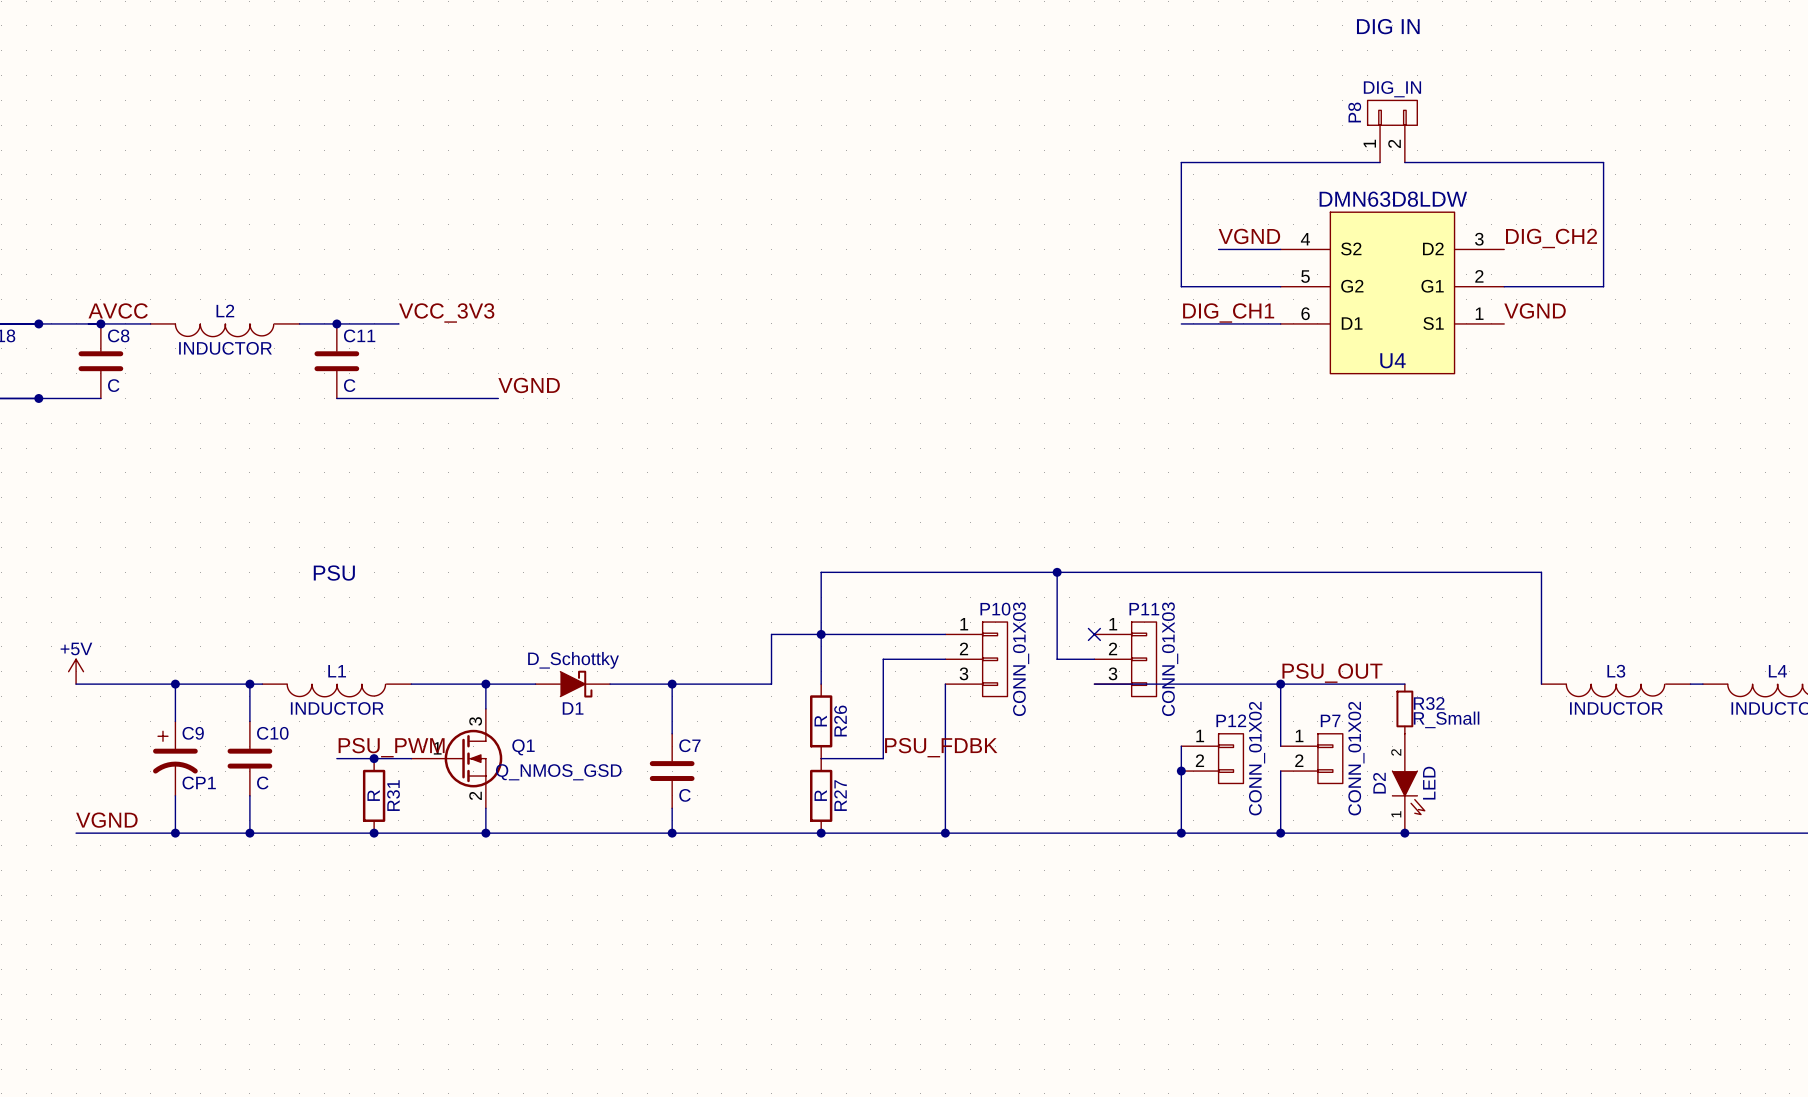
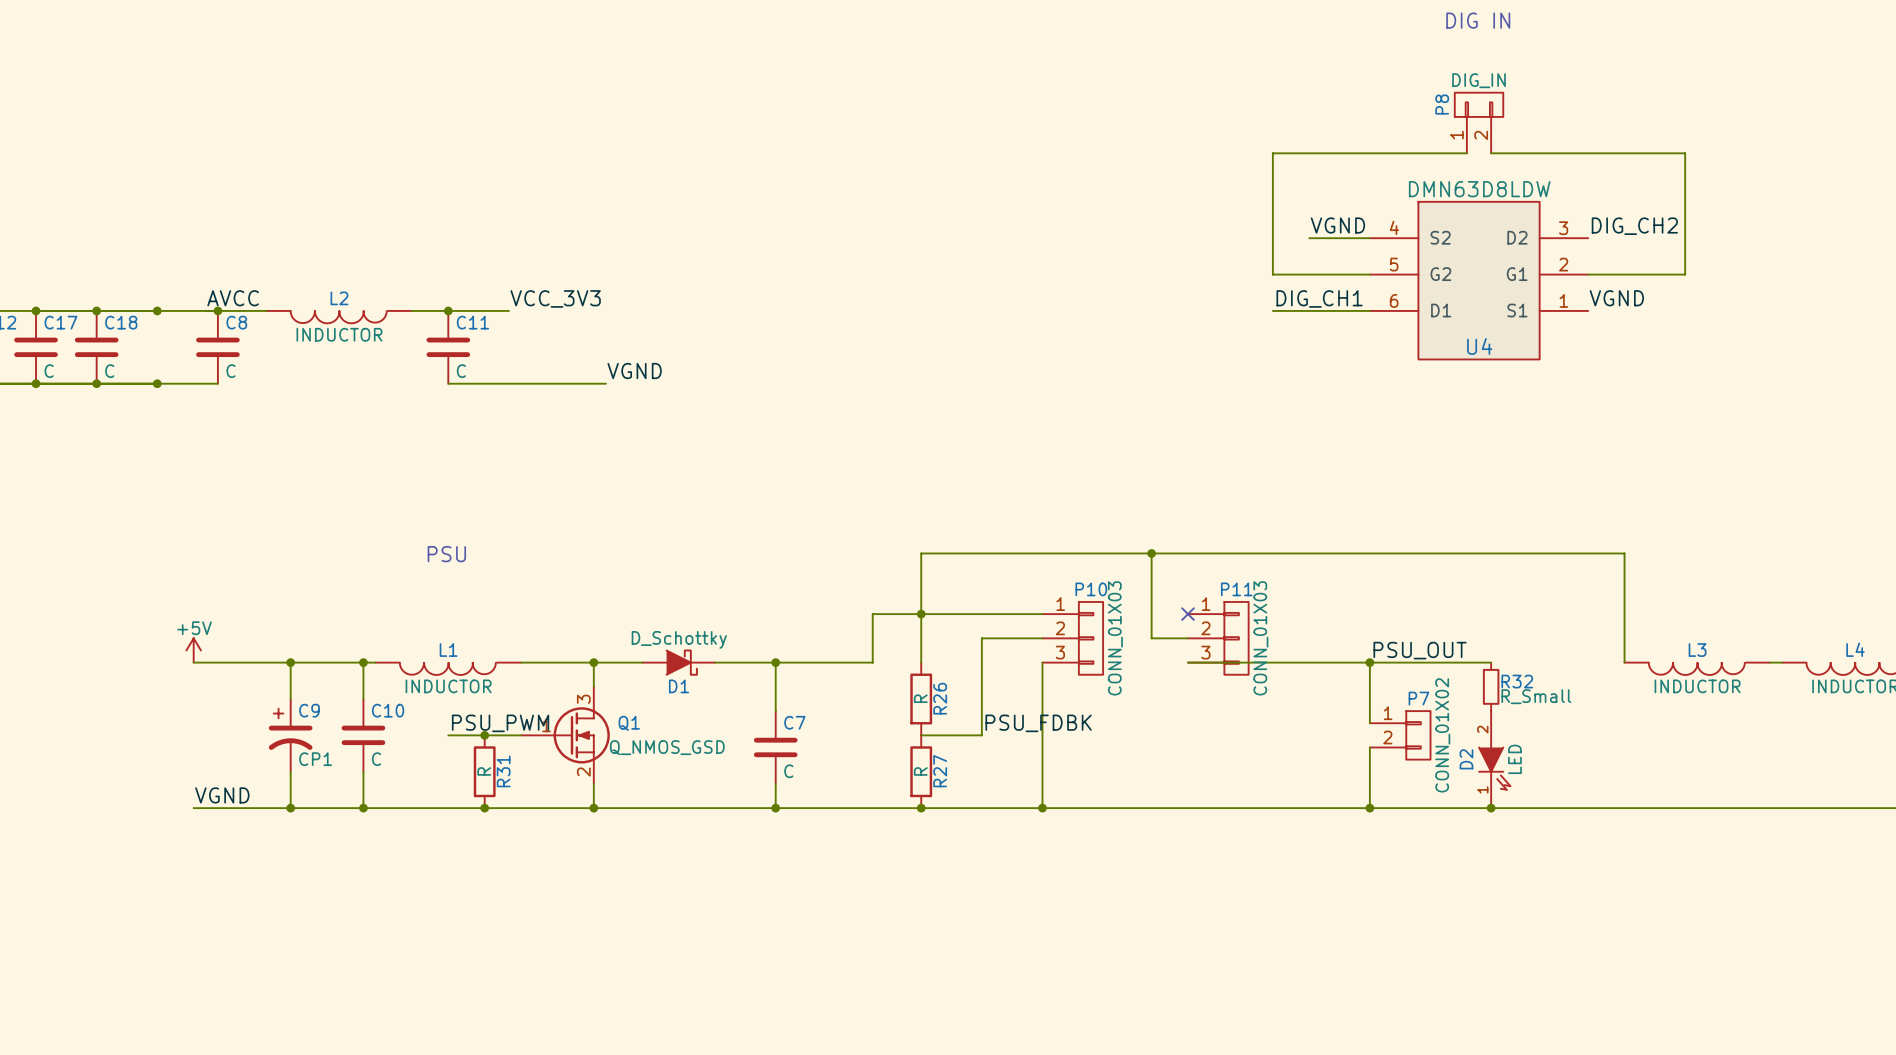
wire: (1181, 746) (1181, 833) -> none
P12: CONN_01X02 (1212, 758) -> none
junction: (1181, 771) -> none
junction: (1181, 833) -> none

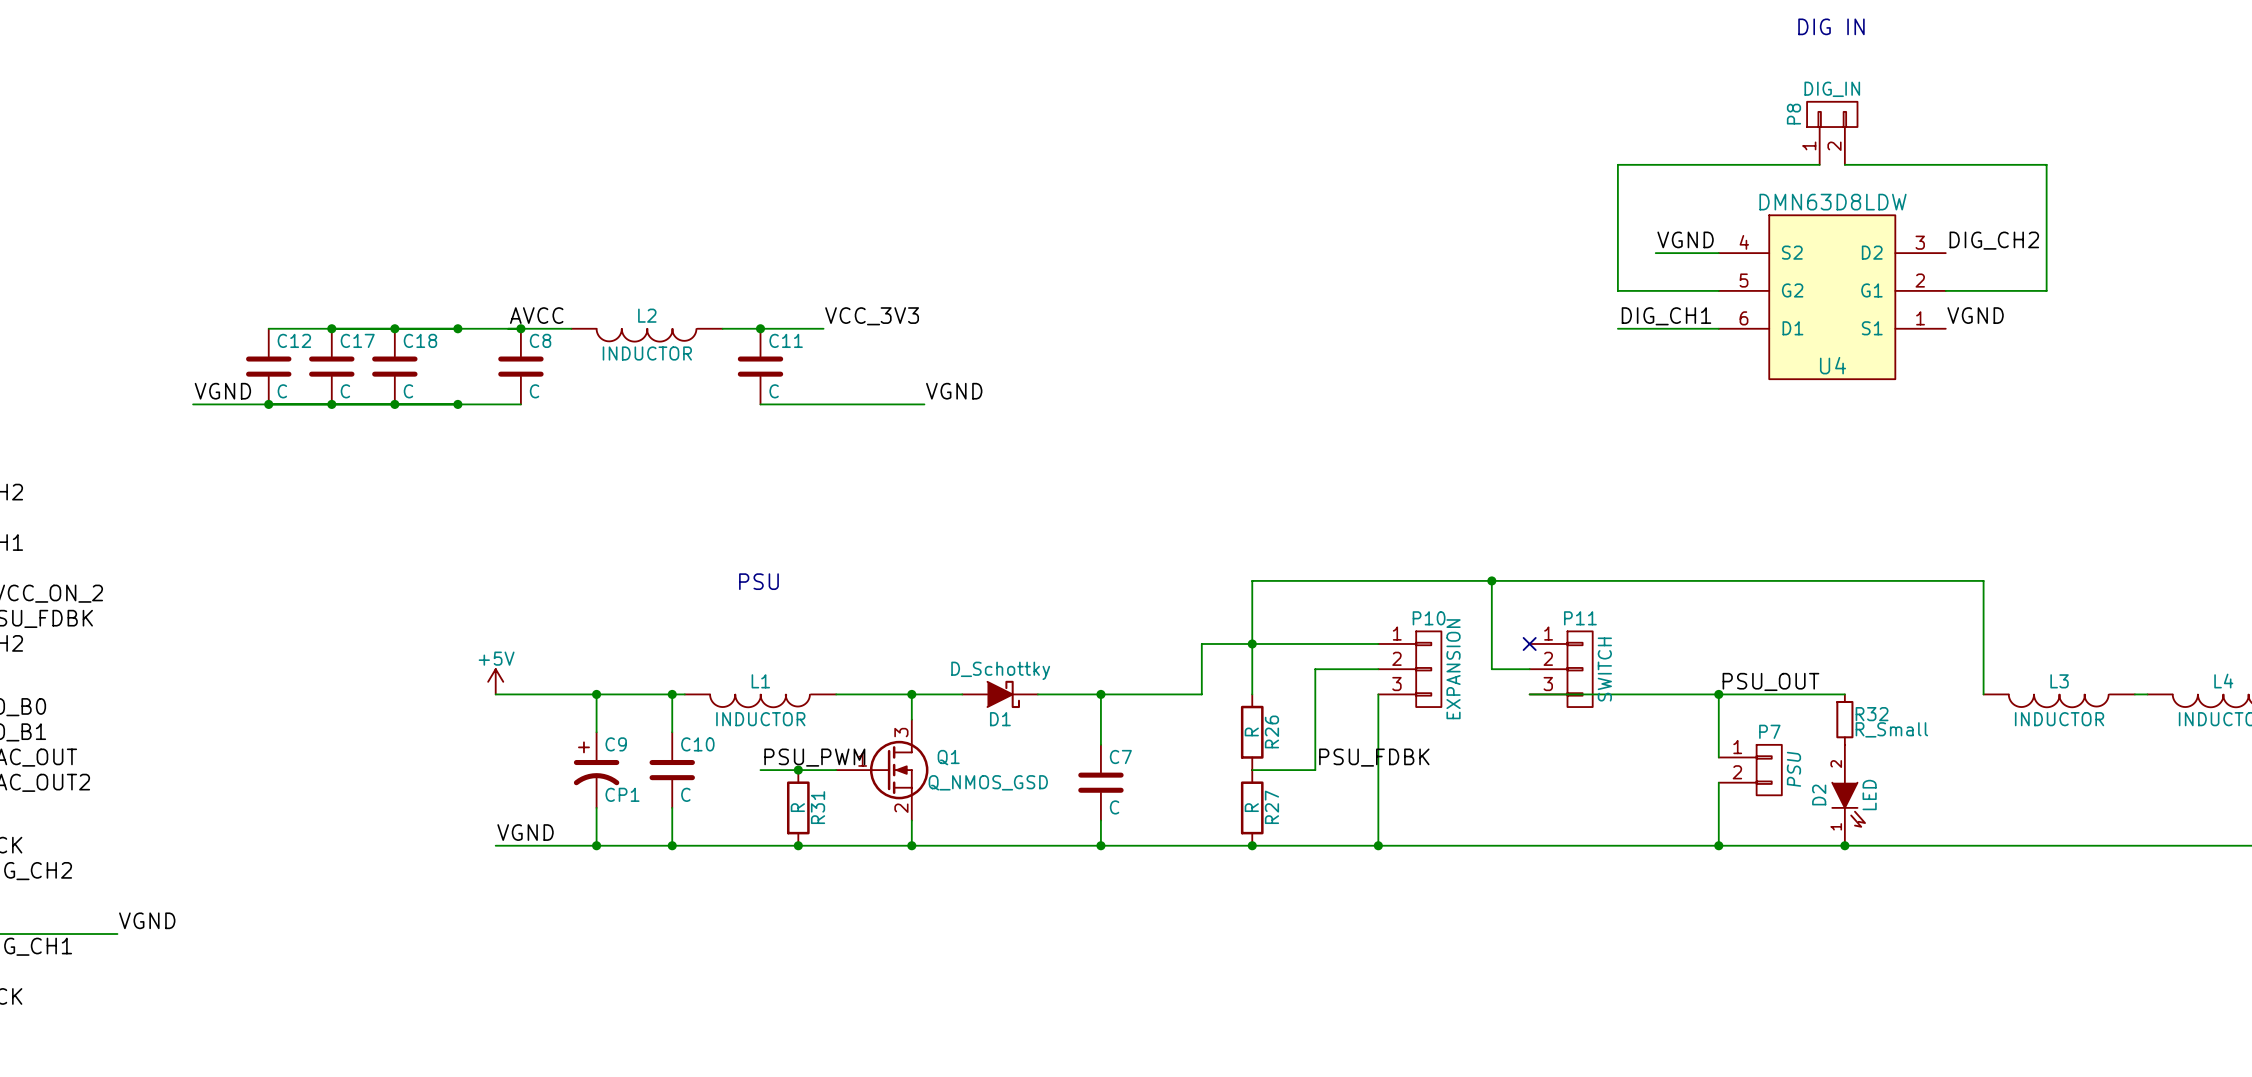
P10 value: CONN_01X03 (1115, 638) -> EXPANSION (1453, 669)
P11 value: CONN_01X03 (1260, 638) -> SWITCH (1604, 669)
P7 value: CONN_01X02 (1442, 735) -> PSU (1793, 769)

